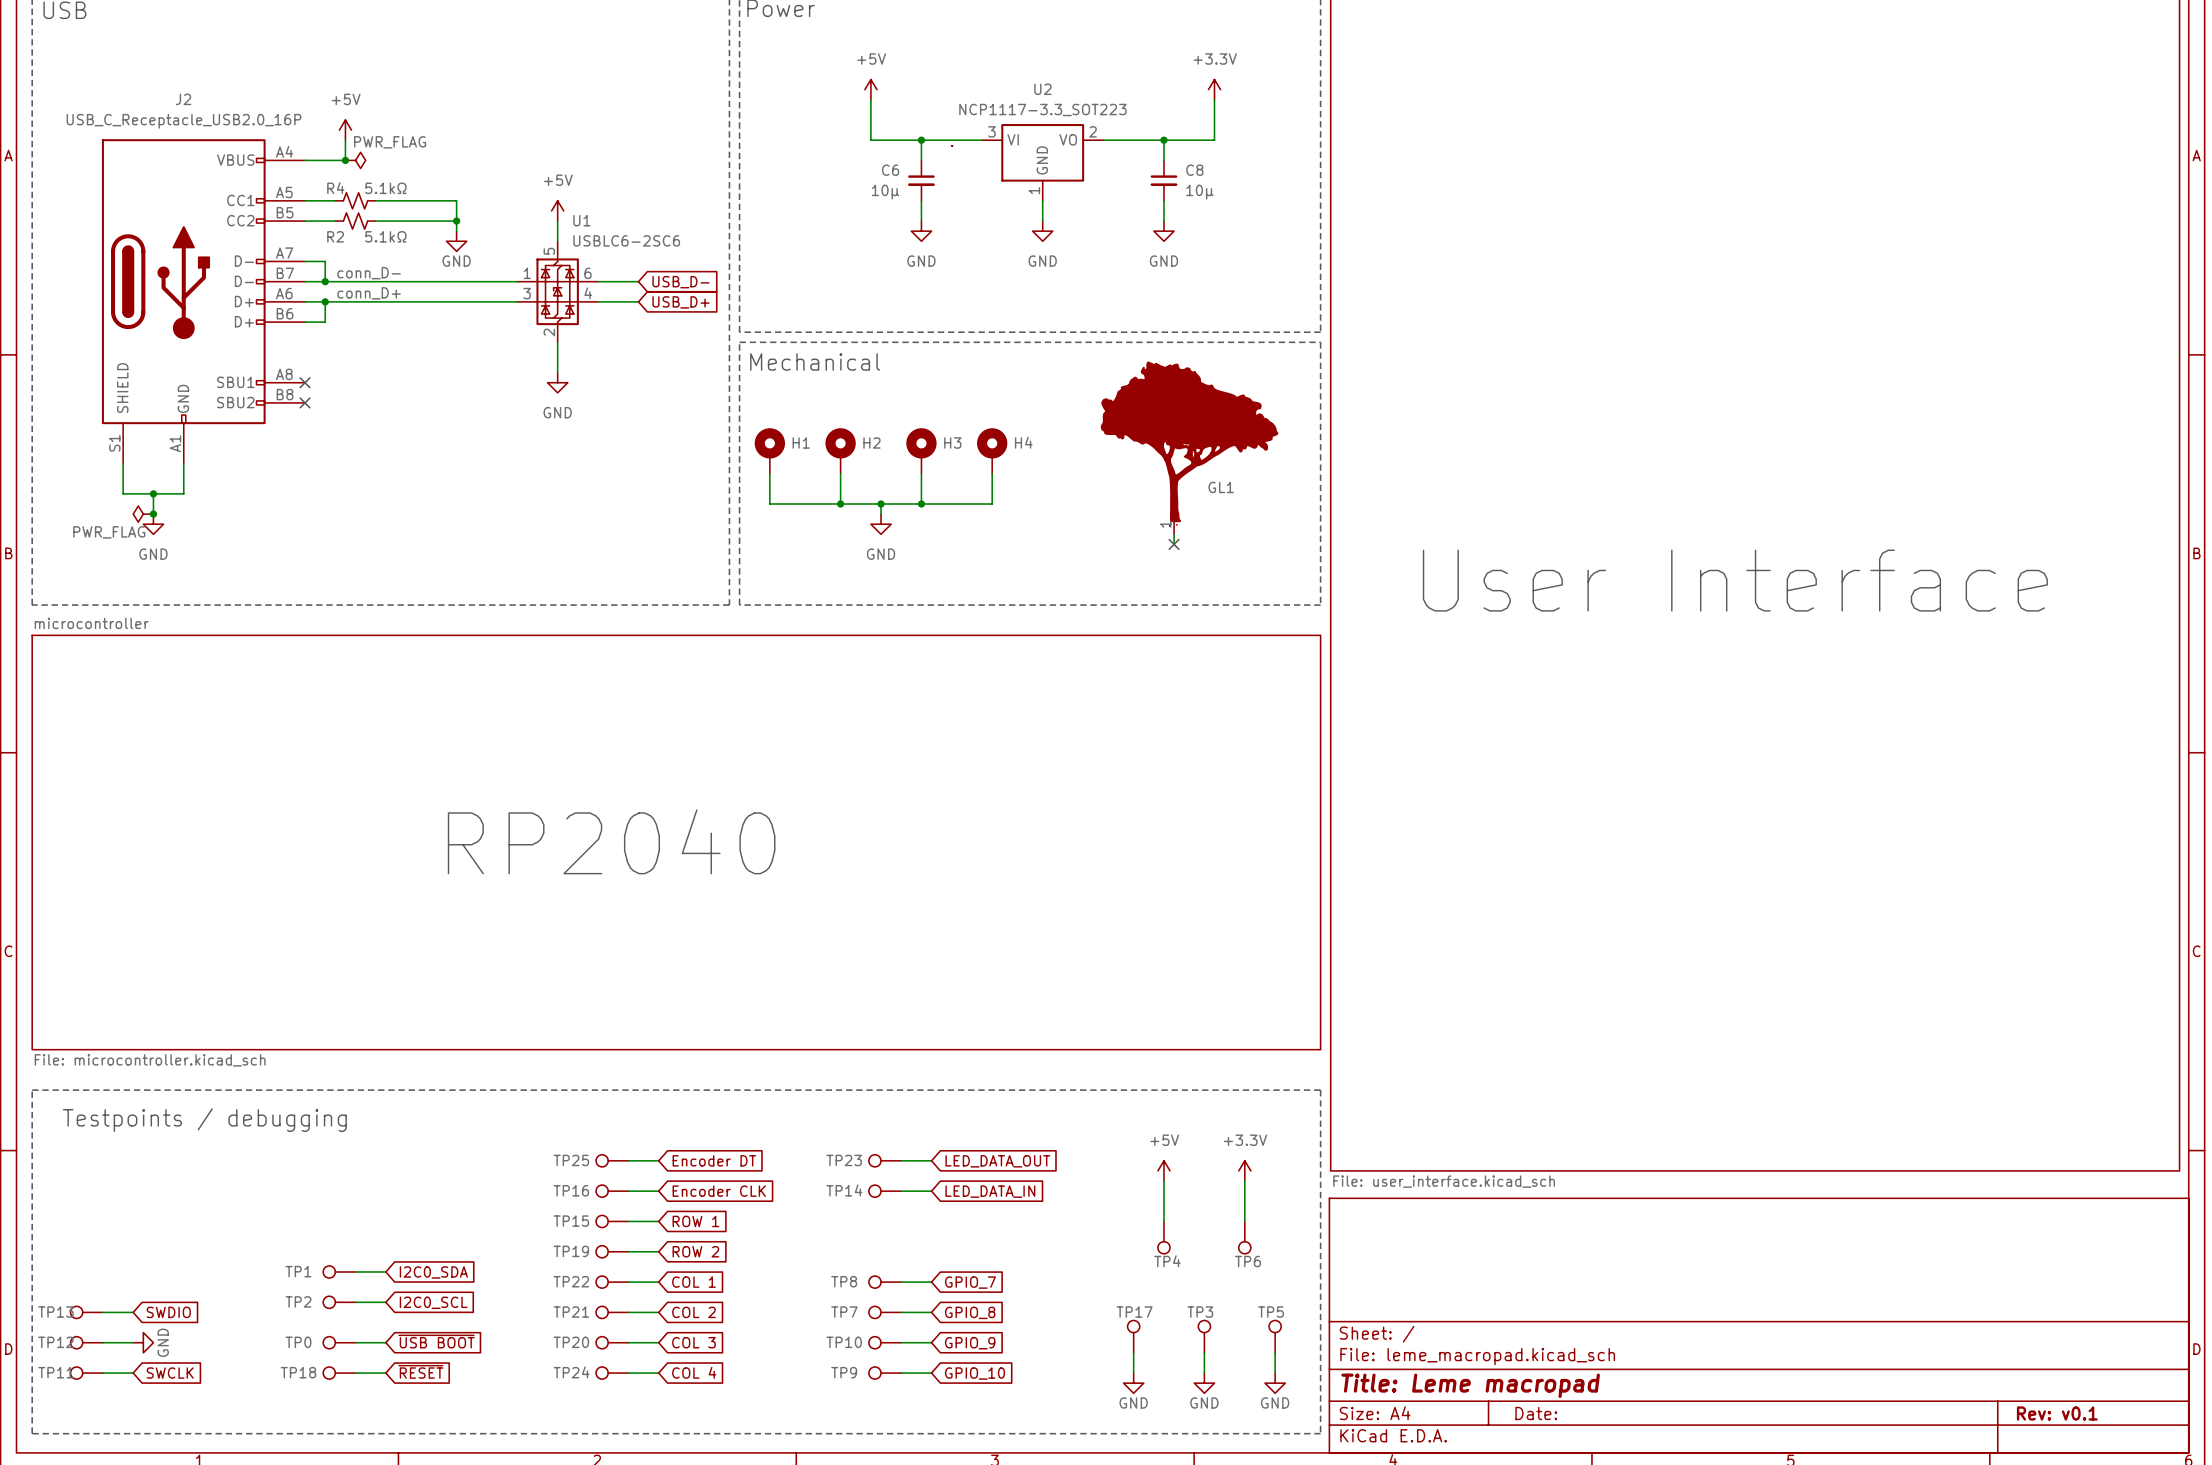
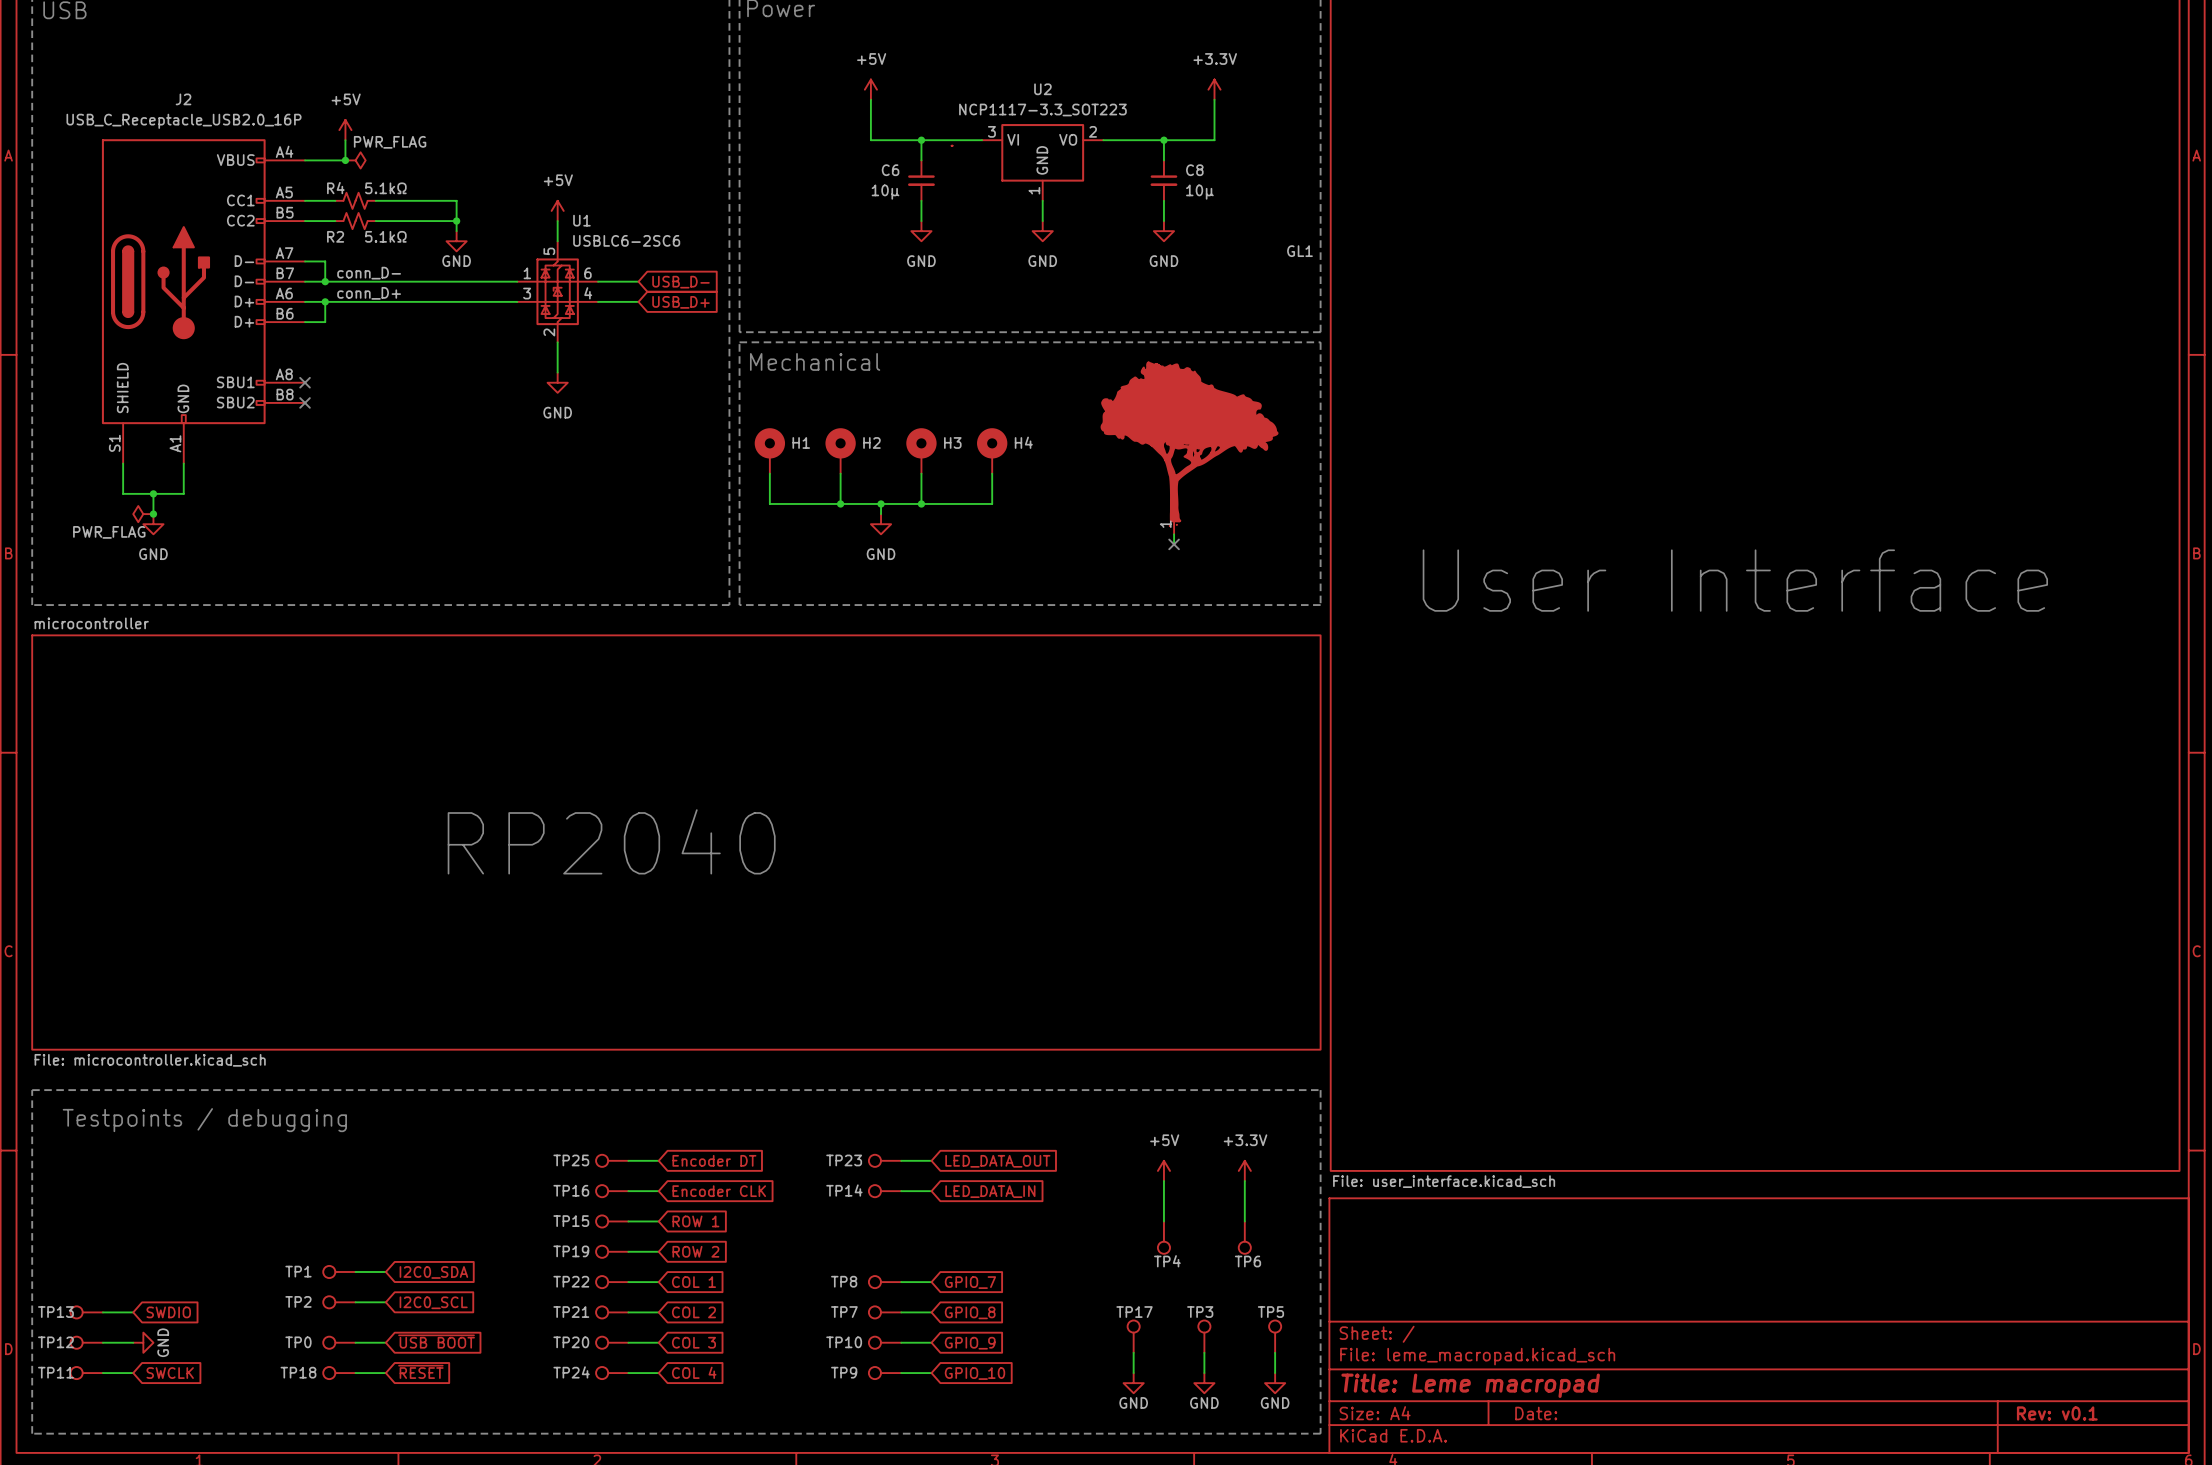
GL1 name position: GL1 (1221, 487) -> GL1 (1299, 251)

